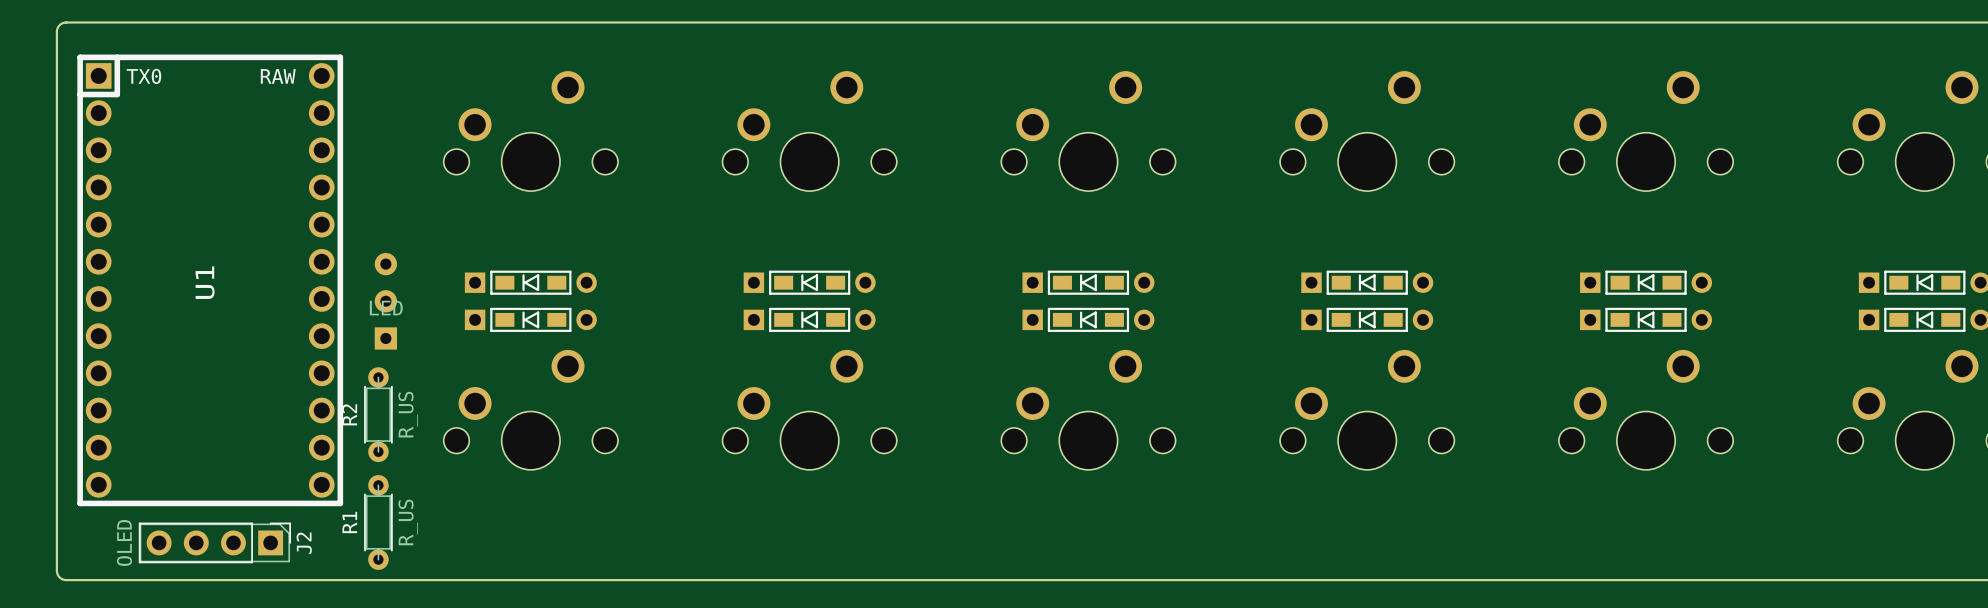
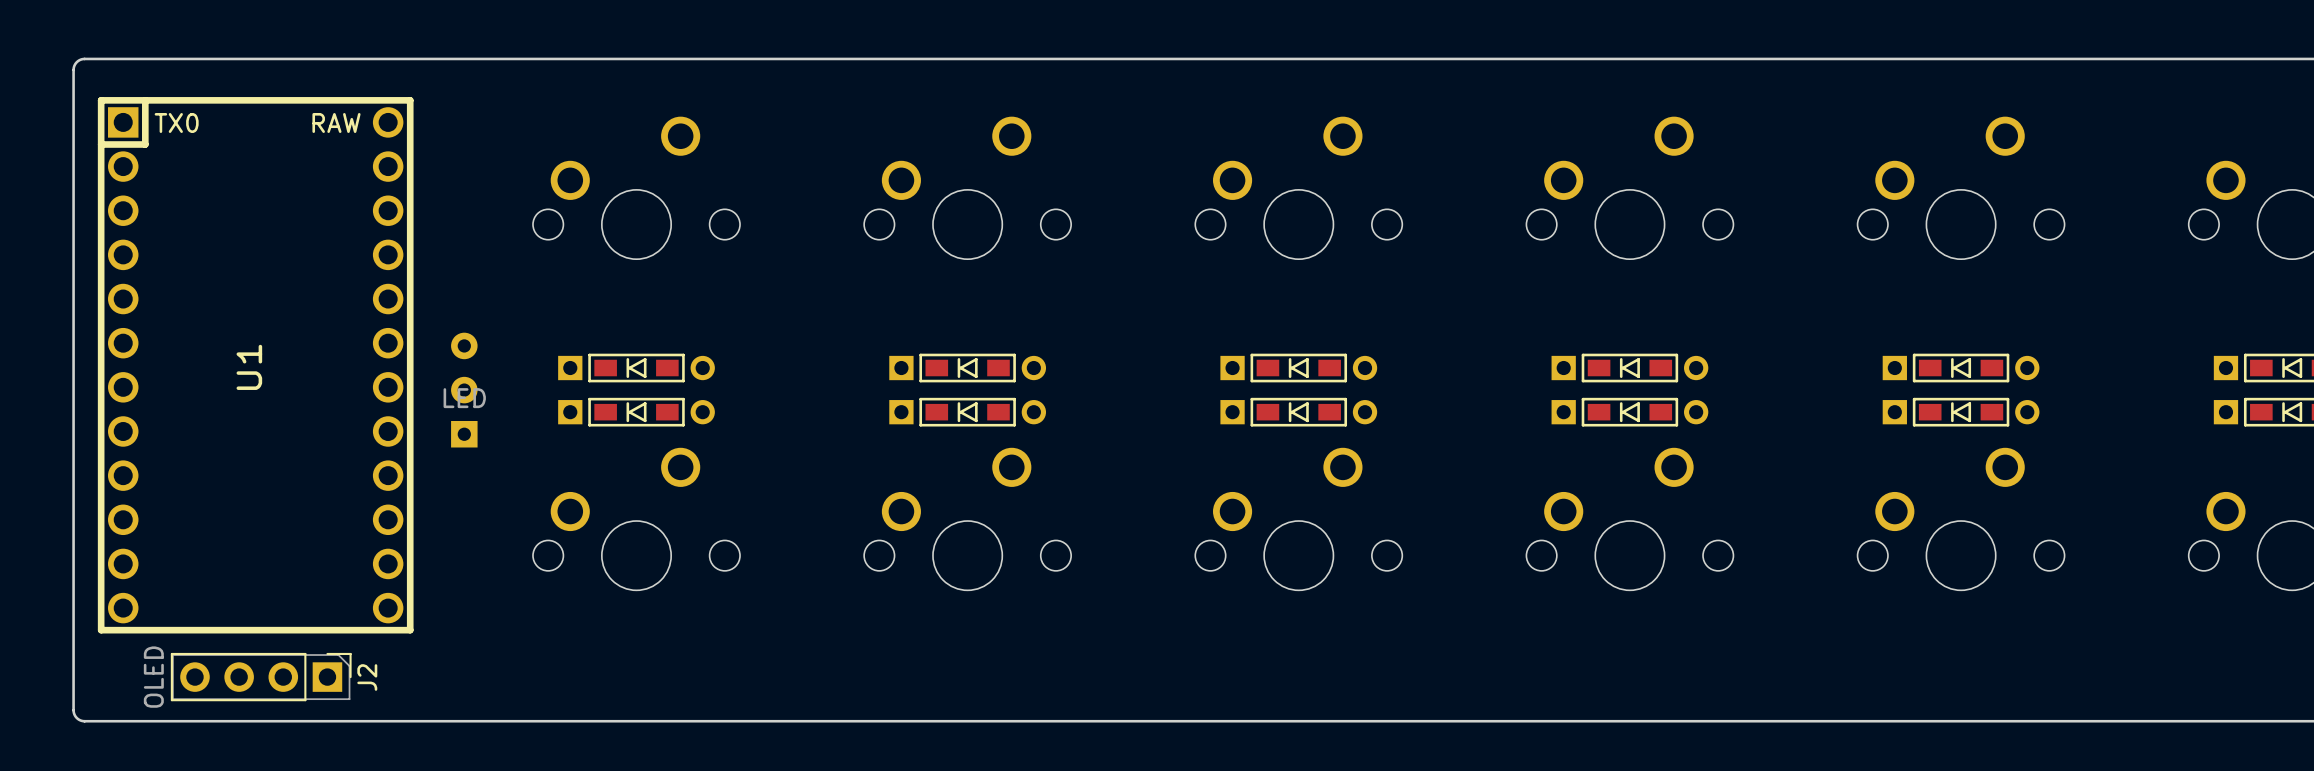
R2: R_US (378, 414) -> none
R1: R_US (378, 522) -> none

